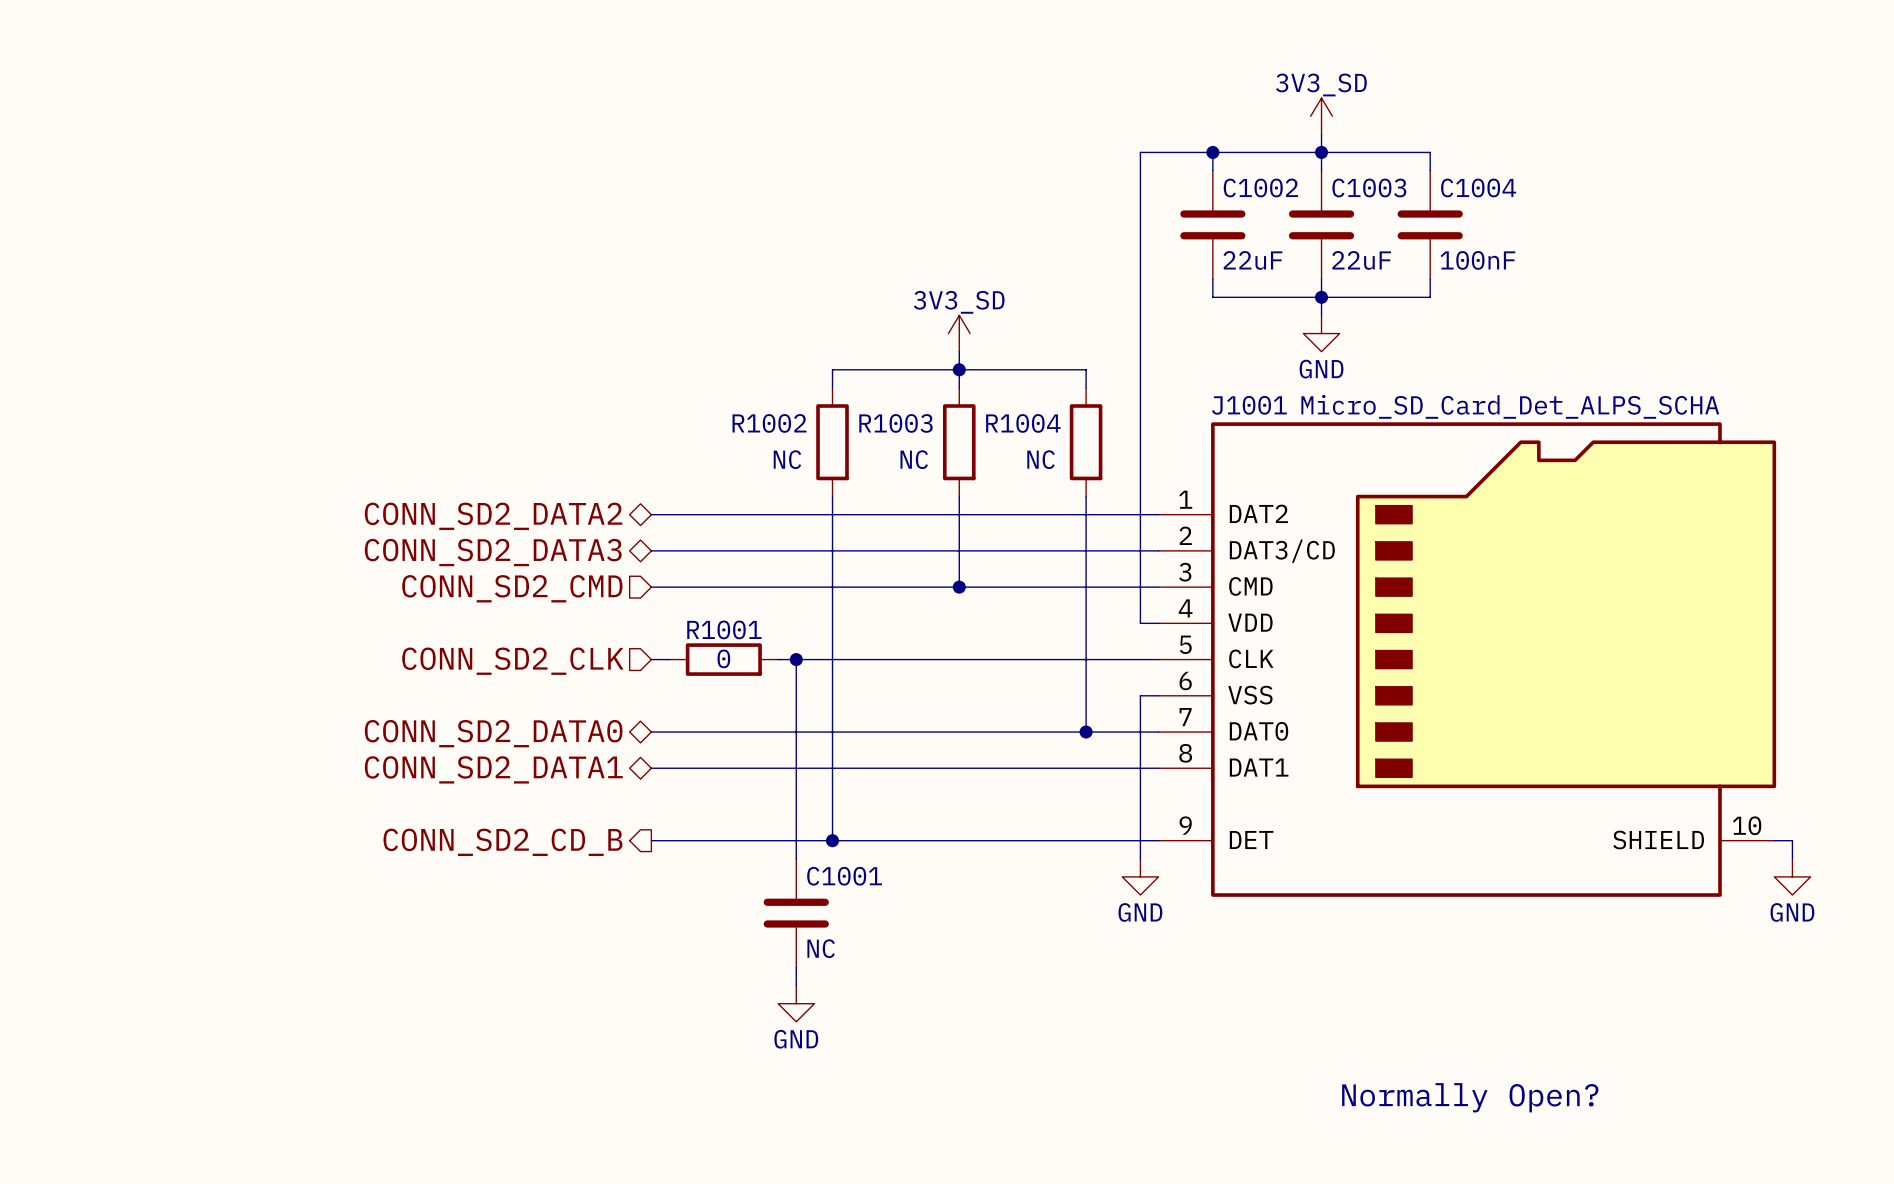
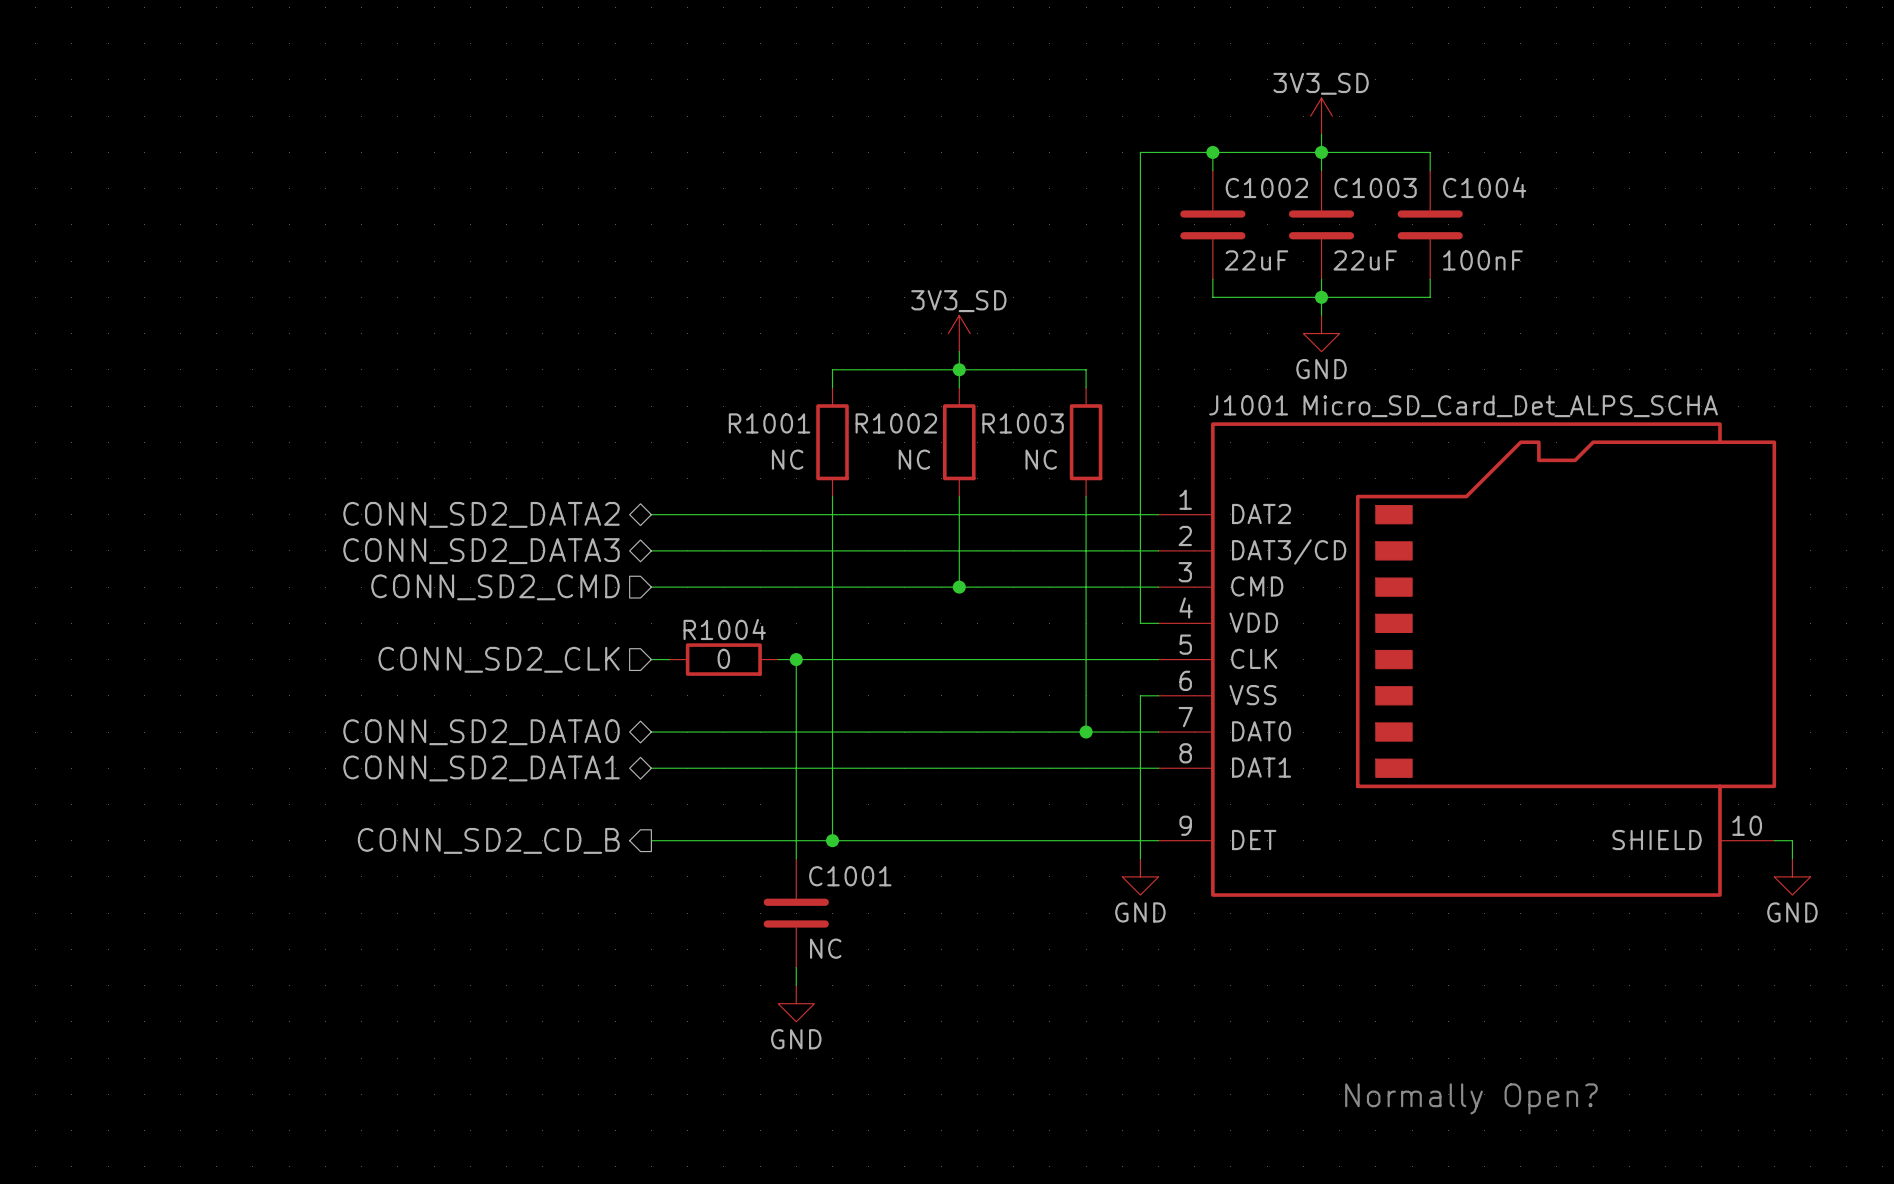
R1002 name: R1002 (769, 423) -> R1001 (769, 423)
R1003 name: R1003 (896, 423) -> R1002 (896, 423)
R1004 name: R1004 (1023, 423) -> R1003 (1023, 423)
R1001 name: R1001 (724, 629) -> R1004 (724, 629)

